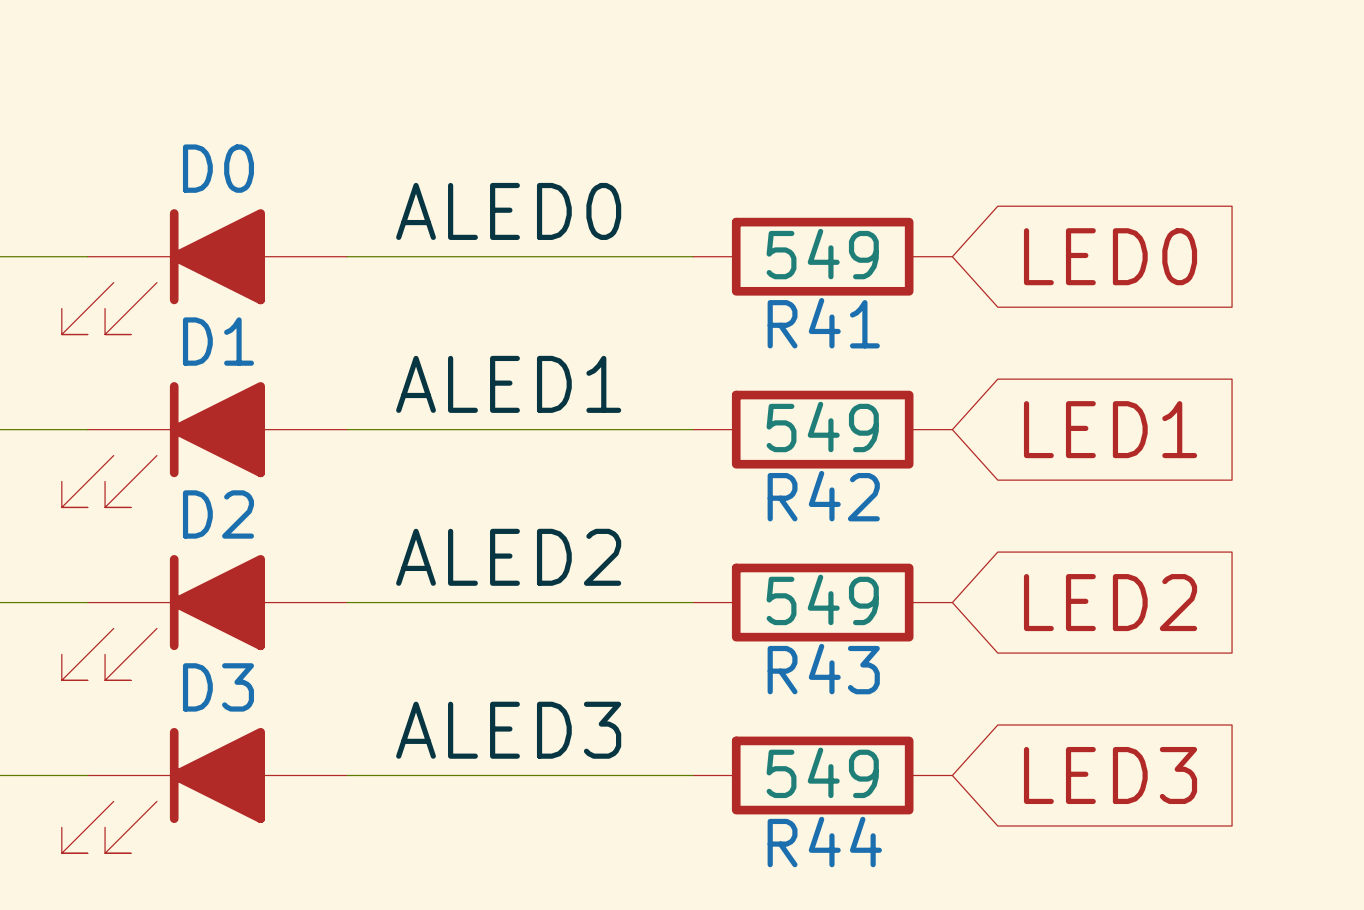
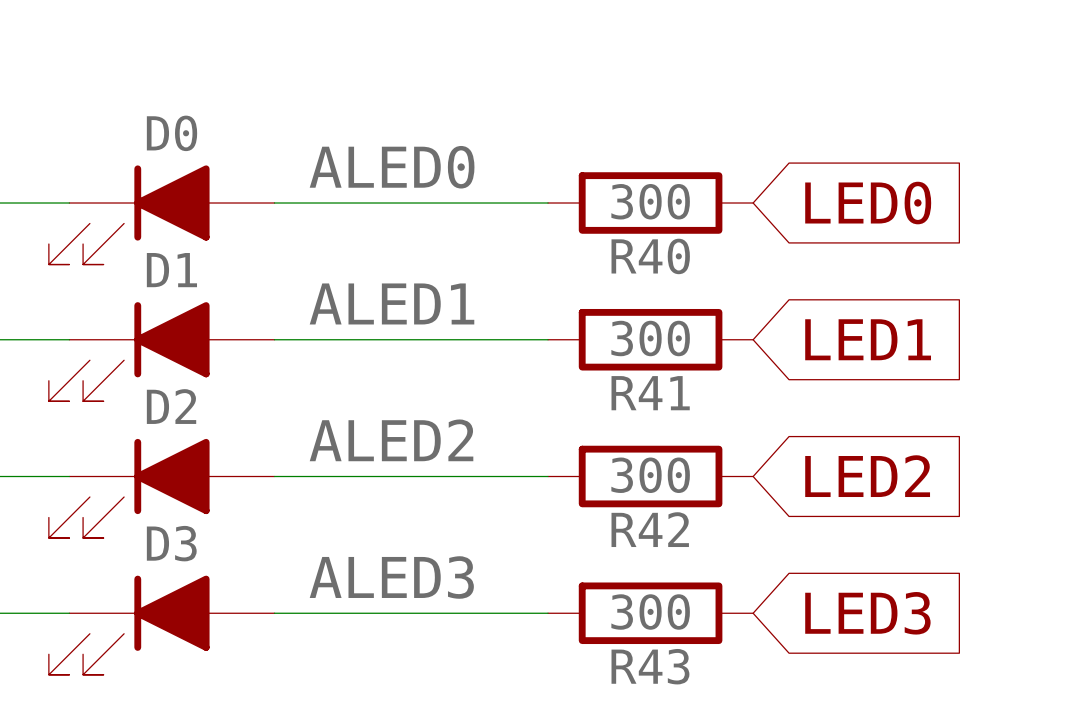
R41 value: 549 (822, 254) -> 300 (650, 201)
R41 name: R41 (823, 323) -> R40 (650, 256)
R42 value: 549 (822, 426) -> 300 (650, 338)
R42 name: R42 (823, 496) -> R41 (650, 393)
R43 value: 549 (822, 599) -> 300 (650, 475)
R43 name: R43 (823, 669) -> R42 (650, 529)
R44 value: 549 (822, 772) -> 300 (650, 612)
R44 name: R44 (824, 842) -> R43 (650, 666)

